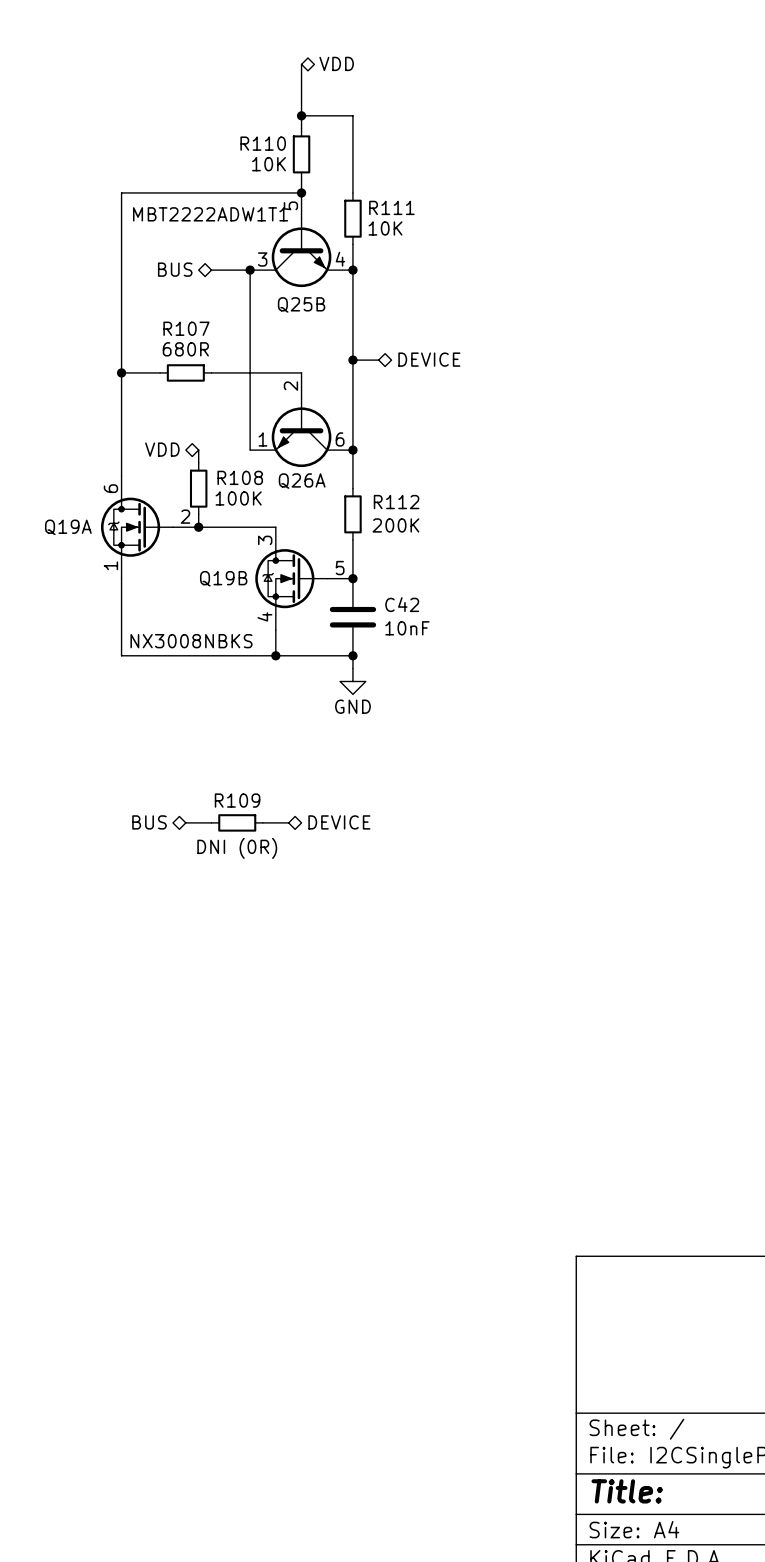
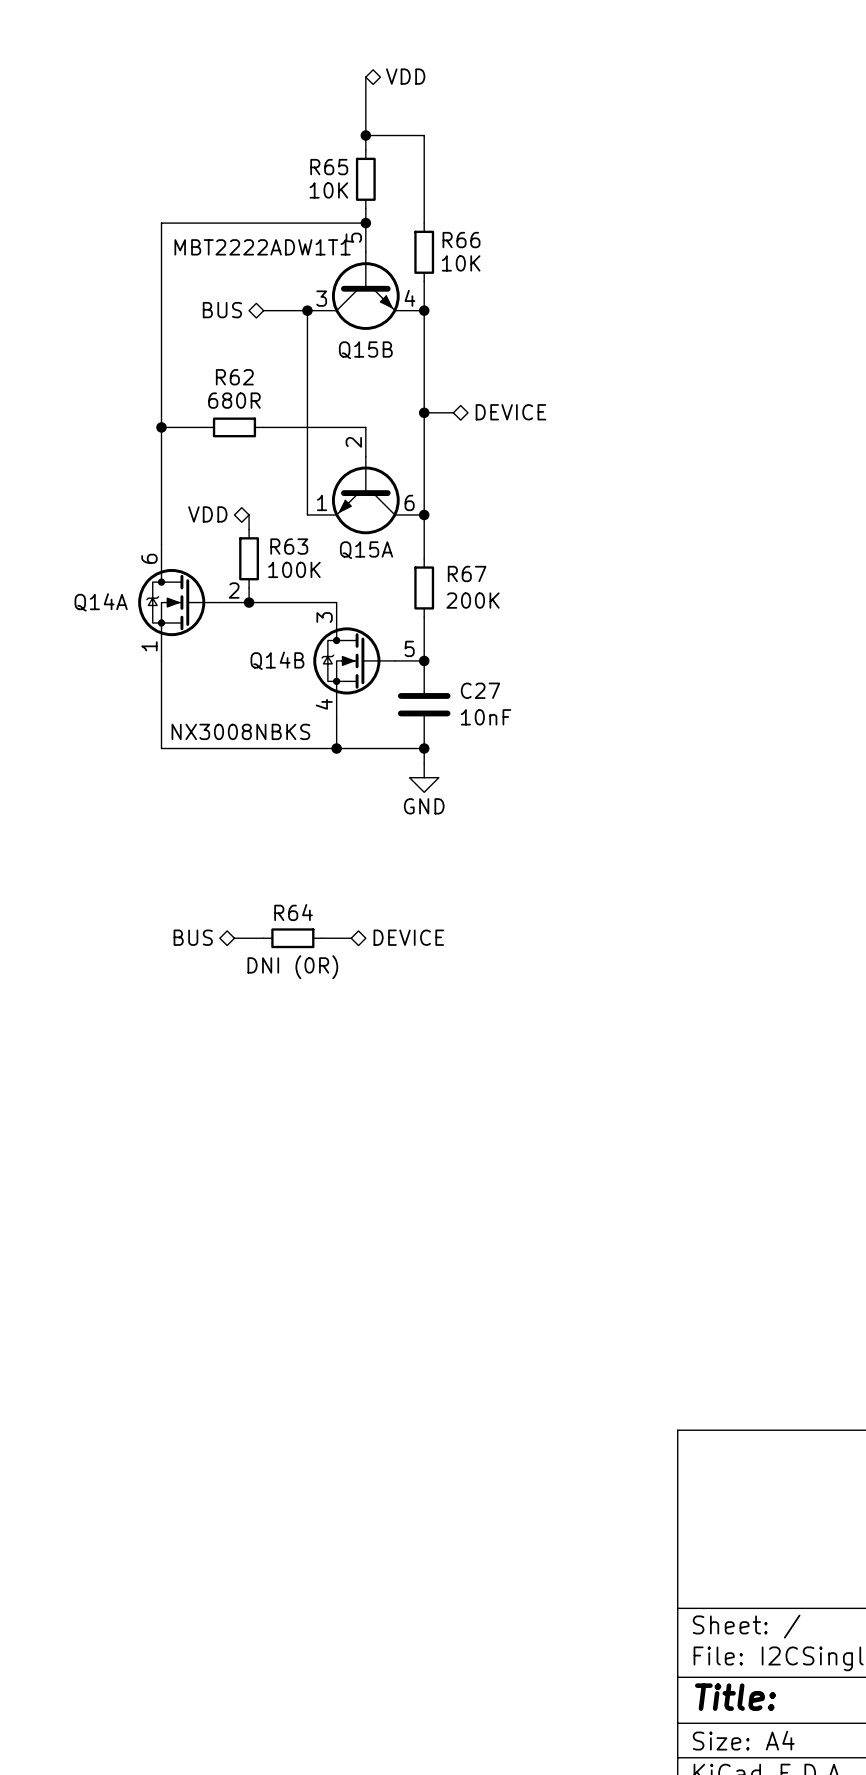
R110 name: R110 (263, 143) -> R65 (329, 167)
R111 name: R111 (391, 207) -> R66 (461, 240)
Q25B name: Q25B (301, 304) -> Q15B (365, 350)
R107 name: R107 (186, 328) -> R62 (234, 377)
R108 name: R108 (240, 477) -> R63 (289, 546)
Q26A name: Q26A (302, 481) -> Q15A (366, 550)
R112 name: R112 (396, 502) -> R67 (467, 573)
Q19A name: Q19A (68, 527) -> Q14A (101, 602)
Q19B name: Q19B (223, 578) -> Q14B (277, 660)
C42 name: C42 (402, 604) -> C27 (480, 690)
R109 name: R109 (237, 800) -> R64 (293, 912)

